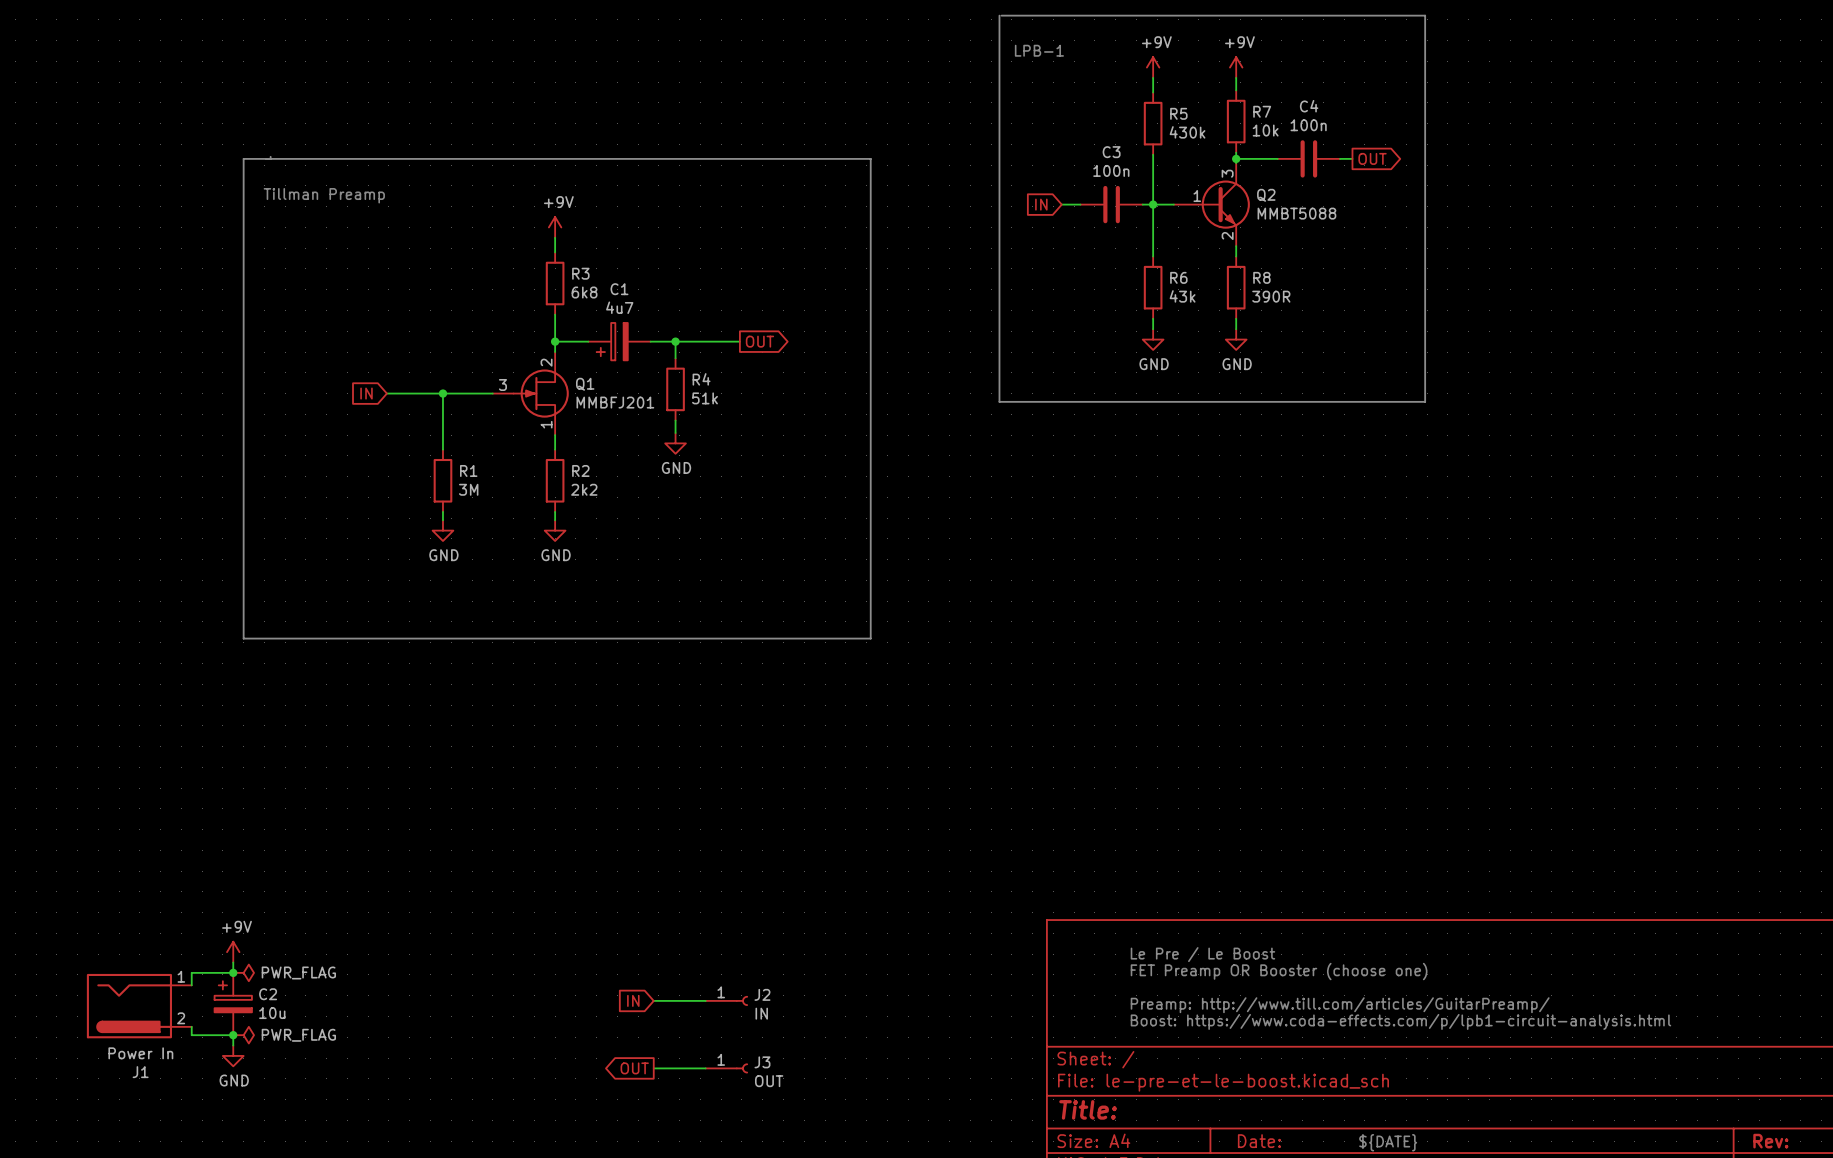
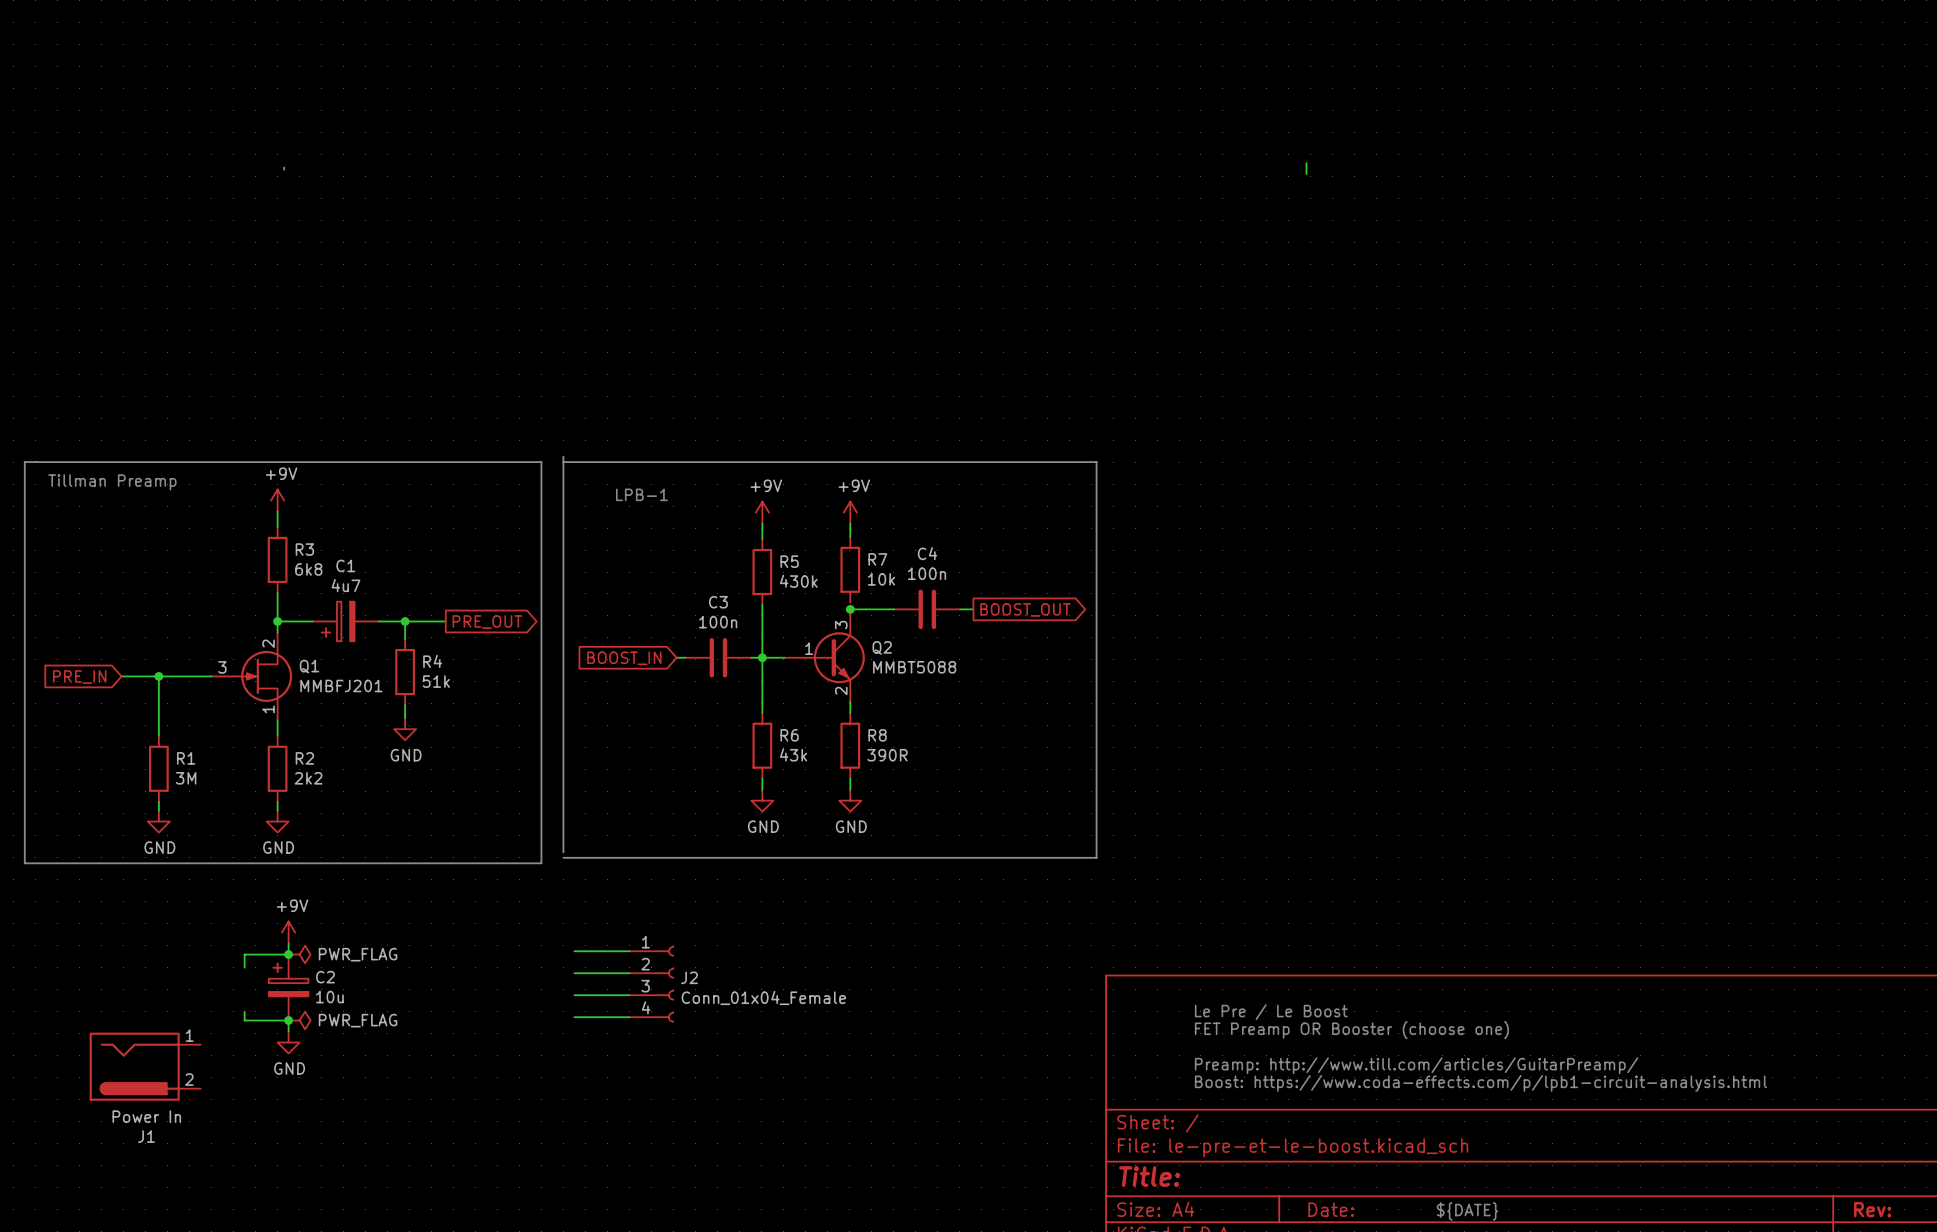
line: (999, 15) (999, 401) (1425, 401) (1425, 15) (1001, 15) -> none
text: LPB-1 (1039, 50) -> none
power symbol: +9V (1153, 67) -> none
power symbol: +9V (1236, 67) -> none
wire: (1153, 77) (1153, 92) -> none
wire: (1236, 77) (1236, 90) -> none
R7 position: (1236, 121) -> (850, 569)
R5 position: (1153, 123) -> (762, 572)
wire: (1153, 154) (1153, 256) -> none
line: (243, 158) (870, 158) (870, 638) (243, 638) (243, 158) -> none
wire: (1236, 158) (1277, 158) -> none
junction: (1236, 158) -> none
C4 position: (1308, 158) -> (927, 609)
wire: (1340, 158) (1352, 158) -> none
global label: OUT (1372, 158) -> none
text: Tillman Preamp (324, 195) -> none
global label: IN (1041, 204) -> none
wire: (1061, 204) (1080, 204) -> none
C3 position: (1111, 204) -> (718, 657)
wire: (1142, 204) (1173, 204) -> none
junction: (1153, 204) -> none
Q2 position: (1211, 204) -> (824, 657)
power symbol: +9V (555, 227) -> none
wire: (555, 237) (555, 252) -> none
wire: (1236, 246) (1236, 256) -> none
R3 position: (555, 283) -> (277, 559)
R6 position: (1153, 287) -> (762, 745)
R8 position: (1236, 287) -> (850, 745)
wire: (555, 314) (555, 352) -> none
wire: (1153, 318) (1153, 329) -> none
wire: (1236, 318) (1236, 329) -> none
power symbol: GND (1153, 339) -> none
power symbol: GND (1236, 339) -> none
wire: (555, 341) (588, 341) -> none
junction: (555, 341) -> none
C1 position: (619, 341) -> (345, 621)
wire: (650, 341) (739, 341) -> none
wire: (675, 341) (675, 358) -> none
junction: (675, 341) -> none
global label: OUT (759, 341) -> none
R4 position: (675, 389) -> (405, 672)
global label: IN (366, 393) -> none
wire: (386, 393) (492, 393) -> none
wire: (442, 393) (442, 449) -> none
junction: (442, 393) -> none
Q1 position: (530, 393) -> (251, 676)
wire: (675, 420) (675, 433) -> (850, 523) (850, 536)
line: none -> (563, 456) (563, 852)
line: none -> (24, 462) (541, 462) (541, 863) (24, 863) (24, 462)
line: none -> (563, 462) (1096, 462) (1096, 857) (563, 857)
wire: (555, 435) (555, 449) -> (762, 523) (762, 539)
power symbol: GND (675, 443) -> none
text: none -> Tillman Preamp (112, 482)
text: none -> LPB-1 (641, 494)
power symbol: none -> +9V (277, 500)
R1 position: (442, 480) -> (158, 768)
R2 position: (555, 480) -> (277, 768)
wire: none -> (277, 511) (277, 526)
power symbol: none -> +9V (762, 512)
power symbol: none -> +9V (850, 512)
wire: (442, 511) (442, 520) -> none
wire: (555, 511) (555, 520) -> none
power symbol: GND (442, 530) -> none
power symbol: GND (555, 530) -> none
wire: none -> (277, 592) (277, 632)
wire: none -> (762, 604) (762, 712)
wire: none -> (850, 609) (894, 609)
junction: none -> (850, 609)
wire: none -> (960, 609) (973, 609)
global label: none -> BOOST_OUT (1025, 609)
wire: none -> (277, 621) (312, 621)
junction: none -> (277, 621)
wire: none -> (378, 621) (445, 621)
wire: none -> (405, 621) (405, 639)
junction: none -> (405, 621)
global label: none -> PRE_OUT (487, 622)
wire: none -> (676, 657) (685, 657)
wire: none -> (751, 657) (784, 657)
junction: none -> (762, 657)
global label: none -> BOOST_IN (624, 658)
wire: none -> (121, 676) (211, 676)
wire: none -> (158, 676) (158, 735)
junction: none -> (158, 676)
global label: none -> PRE_IN (79, 676)
wire: none -> (850, 701) (850, 712)
wire: none -> (405, 705) (405, 718)
wire: none -> (277, 720) (277, 735)
power symbol: none -> GND (405, 729)
wire: none -> (762, 778) (762, 789)
wire: none -> (850, 778) (850, 789)
power symbol: none -> GND (762, 800)
power symbol: none -> GND (850, 800)
wire: none -> (158, 801) (158, 810)
wire: none -> (277, 801) (277, 810)
power symbol: none -> GND (158, 821)
power symbol: none -> GND (277, 821)
wire: none -> (574, 951) (629, 951)
junction: none -> (288, 954)
power symbol: none -> PWR_FLAG (299, 954)
wire: none -> (574, 973) (629, 973)
power symbol position: +9V (233, 952) -> +9V (288, 932)
wire: (233, 962) (233, 972) (191, 972) (191, 985) -> (288, 943) (288, 954) (244, 954) (244, 967)
junction: none -> (288, 1020)
power symbol: none -> PWR_FLAG (299, 1020)
junction: (233, 972) -> none
power symbol: PWR_FLAG (243, 972) -> none
J2 symbol: [705, 996, 748, 1006] -> [629, 946, 675, 1023]
global label: IN (633, 1000) -> none
wire: (653, 1000) (705, 1000) -> (574, 1017) (629, 1017)
C2 position: (233, 1004) -> (288, 987)
J2 value: IN (761, 1013) -> Conn_01x04_Female (763, 997)
wire: (191, 1026) (191, 1035) (233, 1035) (233, 1045) -> (244, 1011) (244, 1020) (288, 1020) (288, 1031)
junction: (233, 1035) -> none
power symbol: PWR_FLAG (243, 1035) -> none
power symbol position: GND (233, 1055) -> GND (288, 1042)
global label: OUT (634, 1068) -> none
wire: (653, 1068) (705, 1068) -> (574, 995) (629, 995)
J3: OUT (726, 1068) -> none

